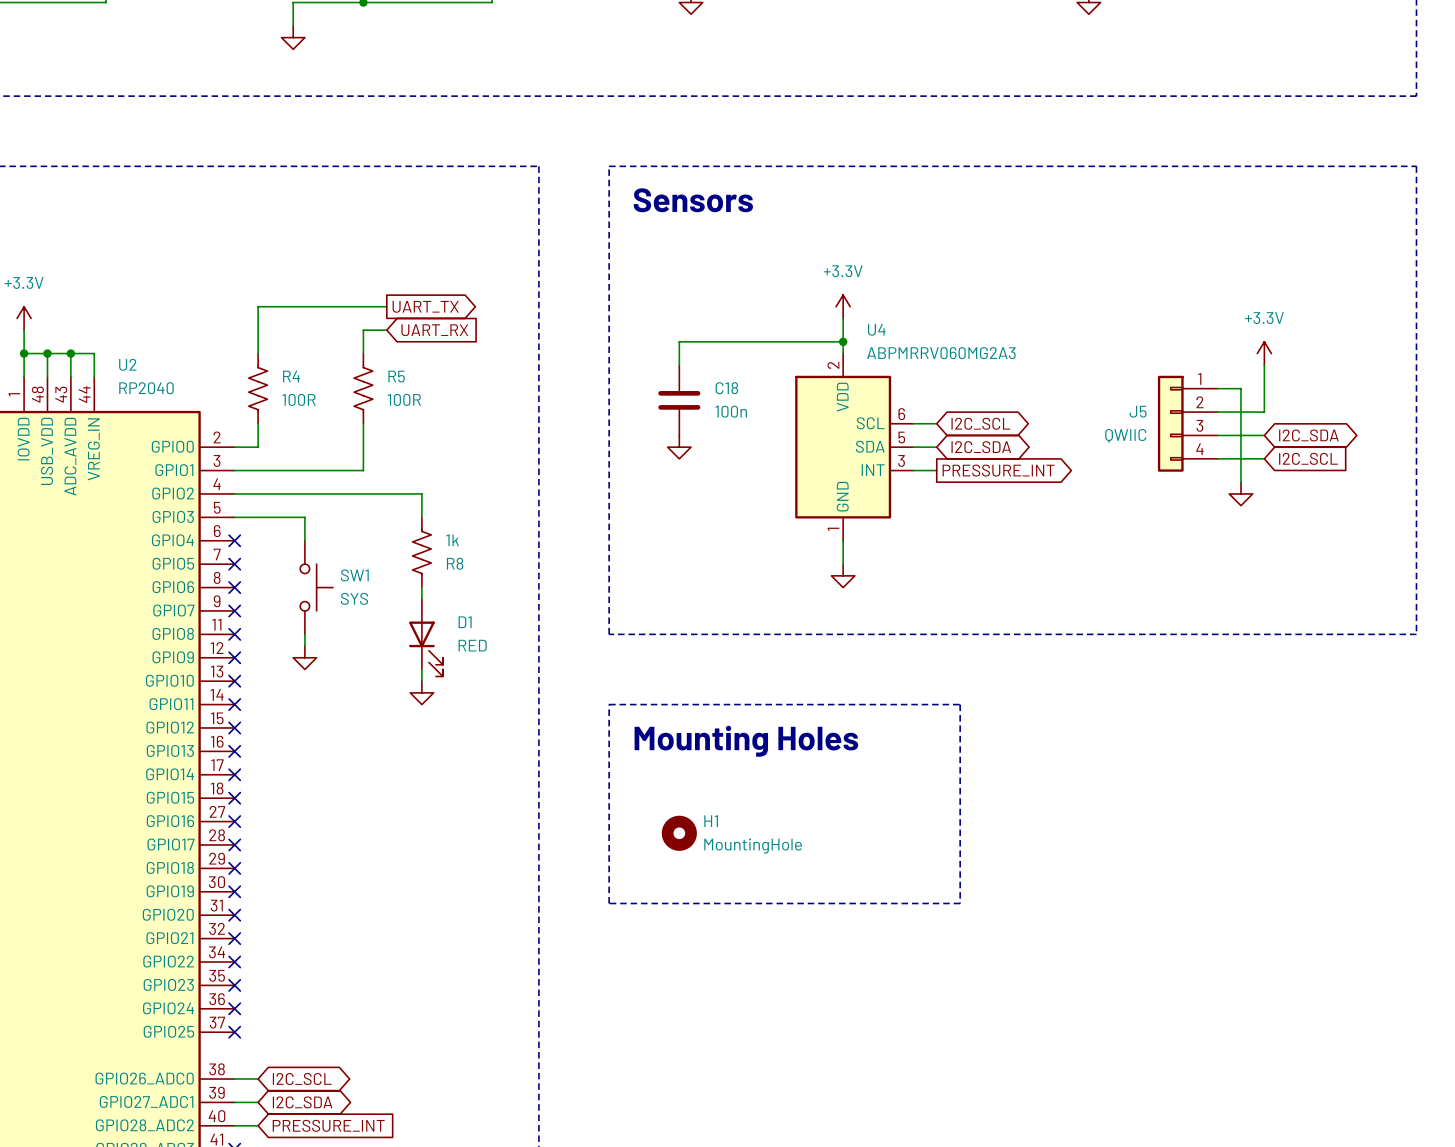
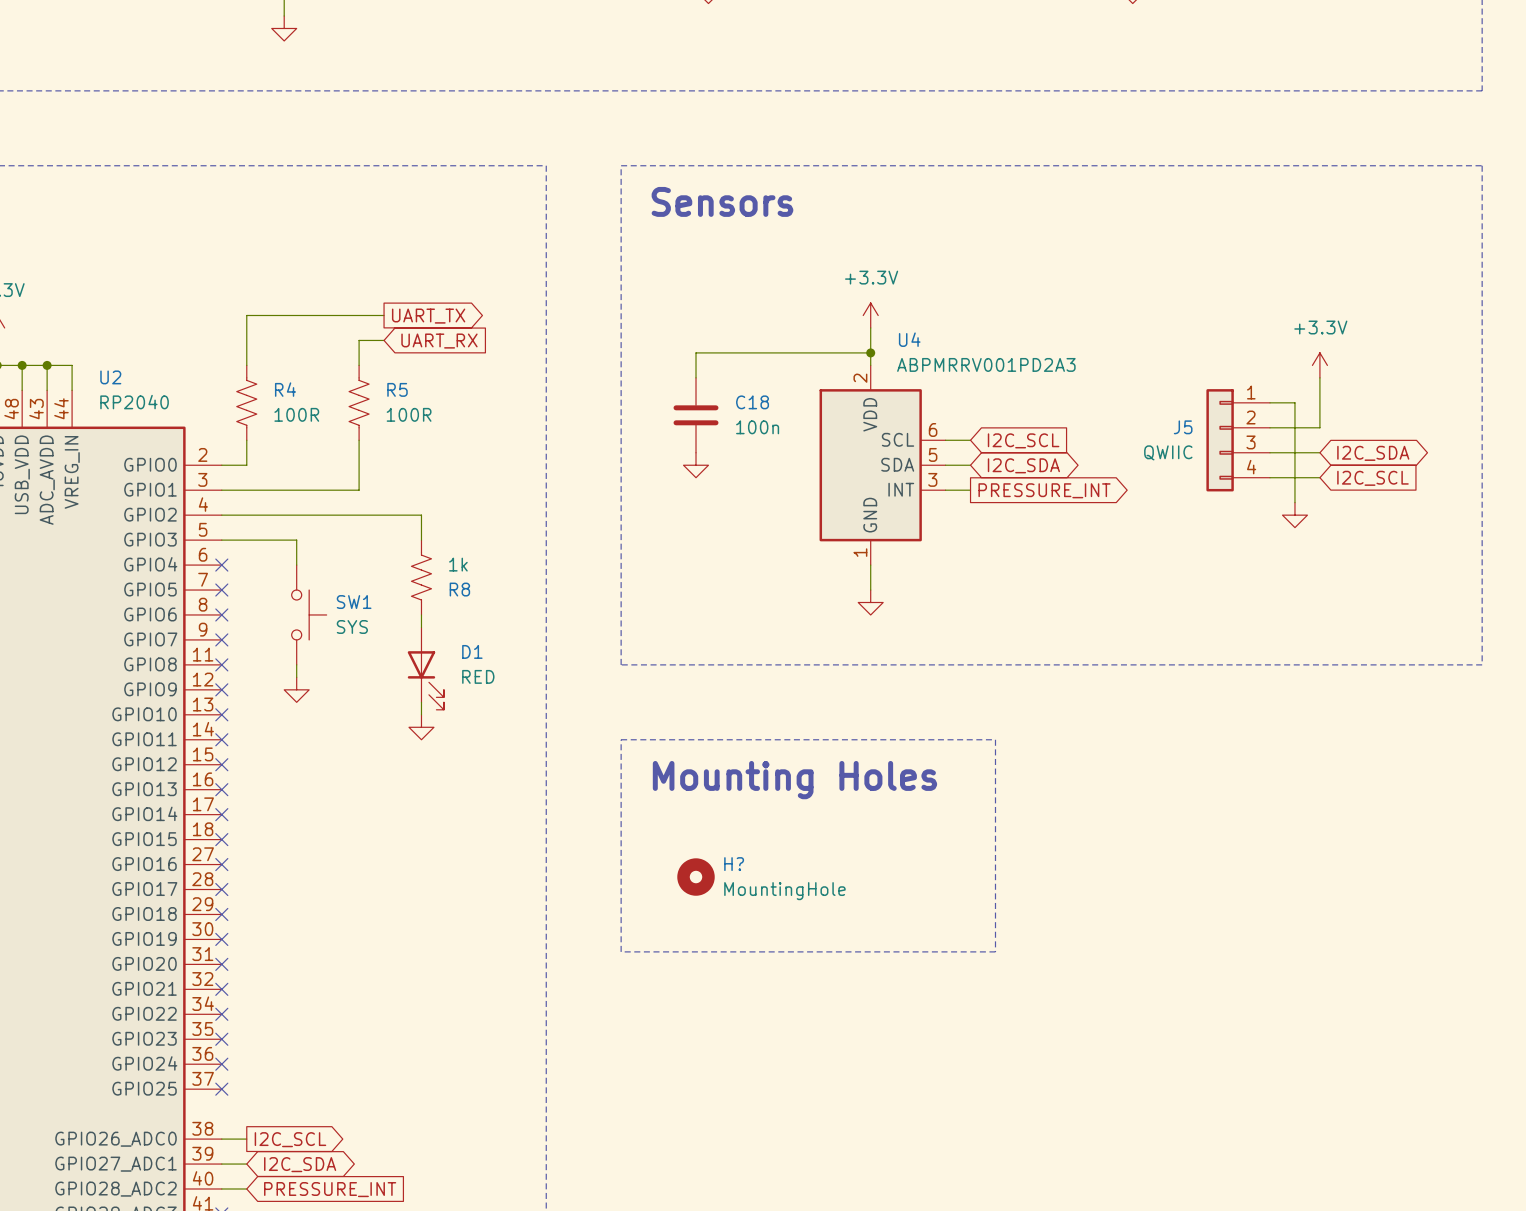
U4 value: ABPMRRV060MG2A3 (941, 353) -> ABPMRRV001PD2A3 (986, 364)
global label shape: bidirectional (980, 423) -> input (1023, 440)
H1 name: H1 (711, 821) -> H? (734, 864)
global label shape: bidirectional (302, 1079) -> output (290, 1139)

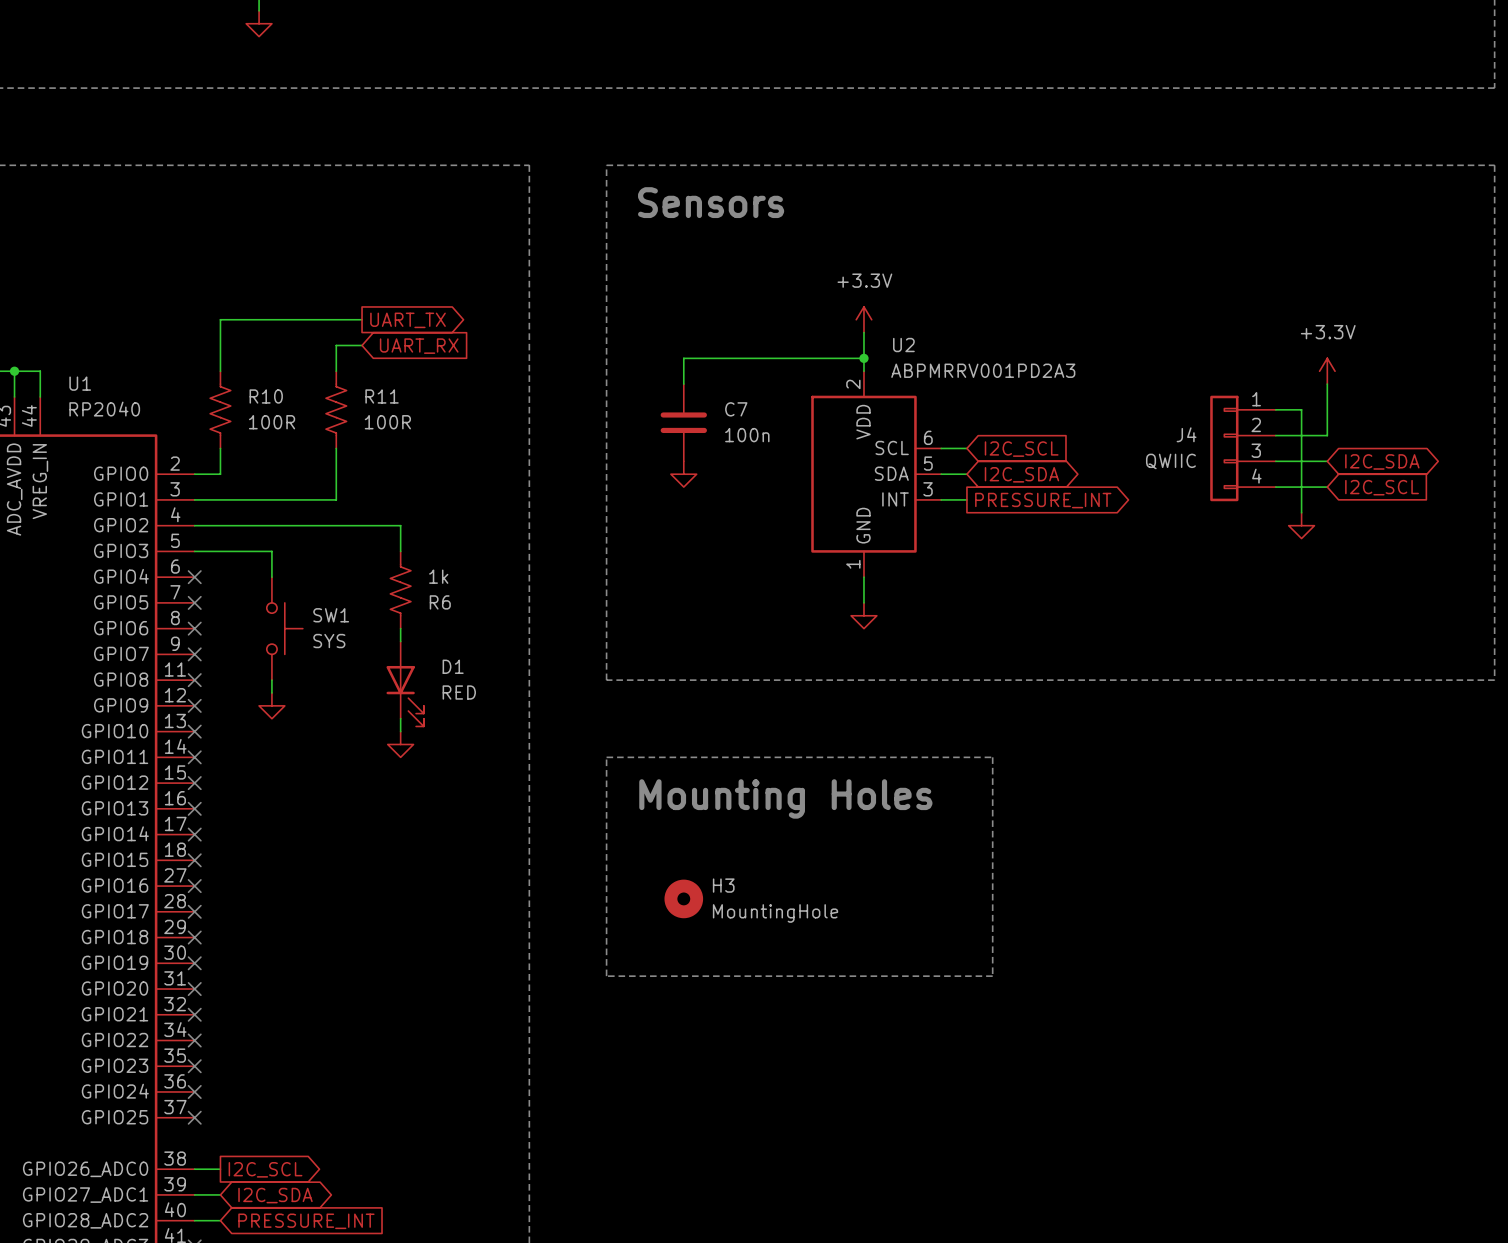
U4 name: U4 (909, 339) -> U2 (903, 345)
U2 name: U2 (110, 377) -> U1 (80, 383)
R4 name: R4 (285, 389) -> R10 (266, 396)
R5 name: R5 (397, 389) -> R11 (382, 396)
C18 name: C18 (752, 402) -> C7 (736, 409)
J5 name: J5 (1183, 427) -> J4 (1186, 434)
R8 name: R8 (459, 589) -> R6 (440, 602)
H? name: H? (734, 864) -> H3 (723, 885)

